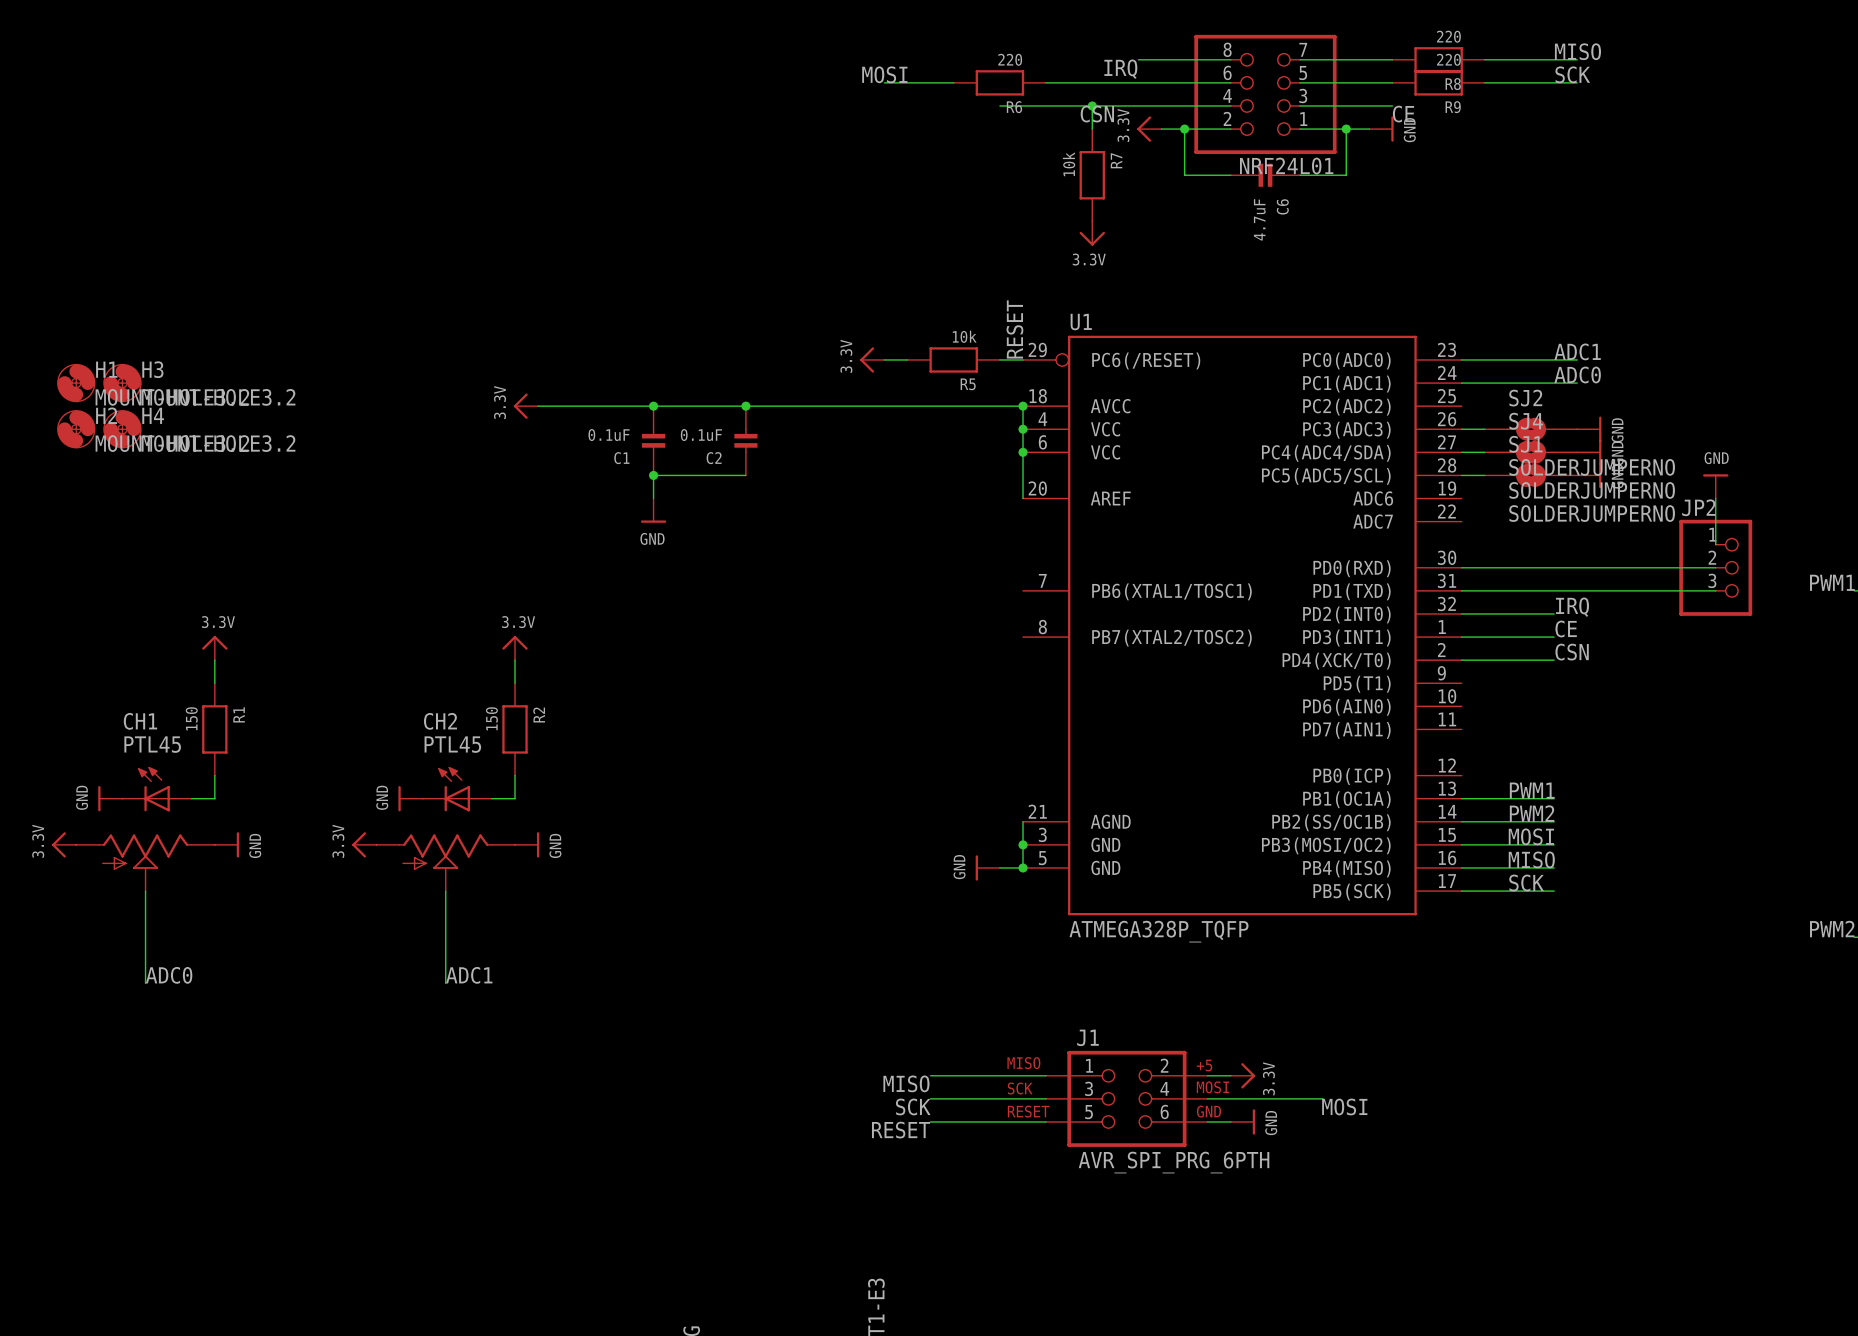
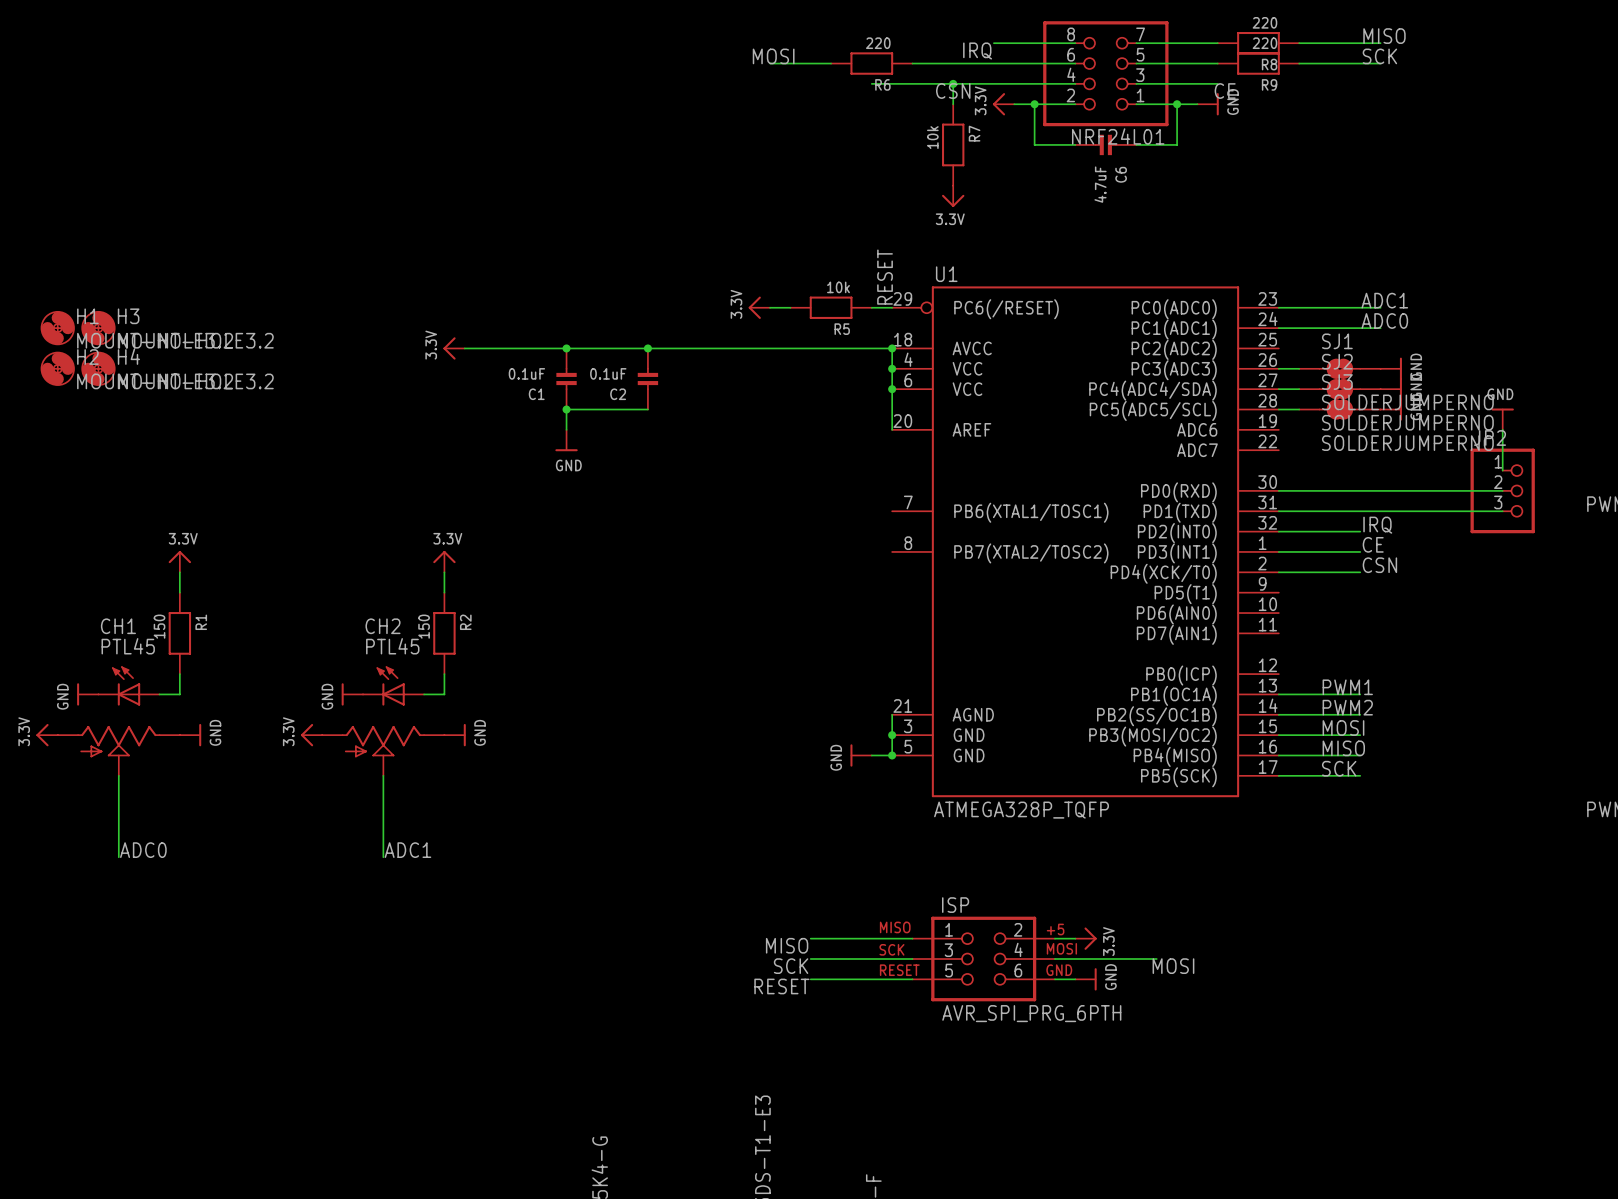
SJ2 name: SJ2 (1525, 398) -> SJ1 (1337, 341)
SJ4 name: SJ4 (1526, 421) -> SJ2 (1337, 361)
SJ1 name: SJ1 (1525, 444) -> SJ3 (1337, 382)
J1 name: J1 (1087, 1037) -> ISP (955, 905)

